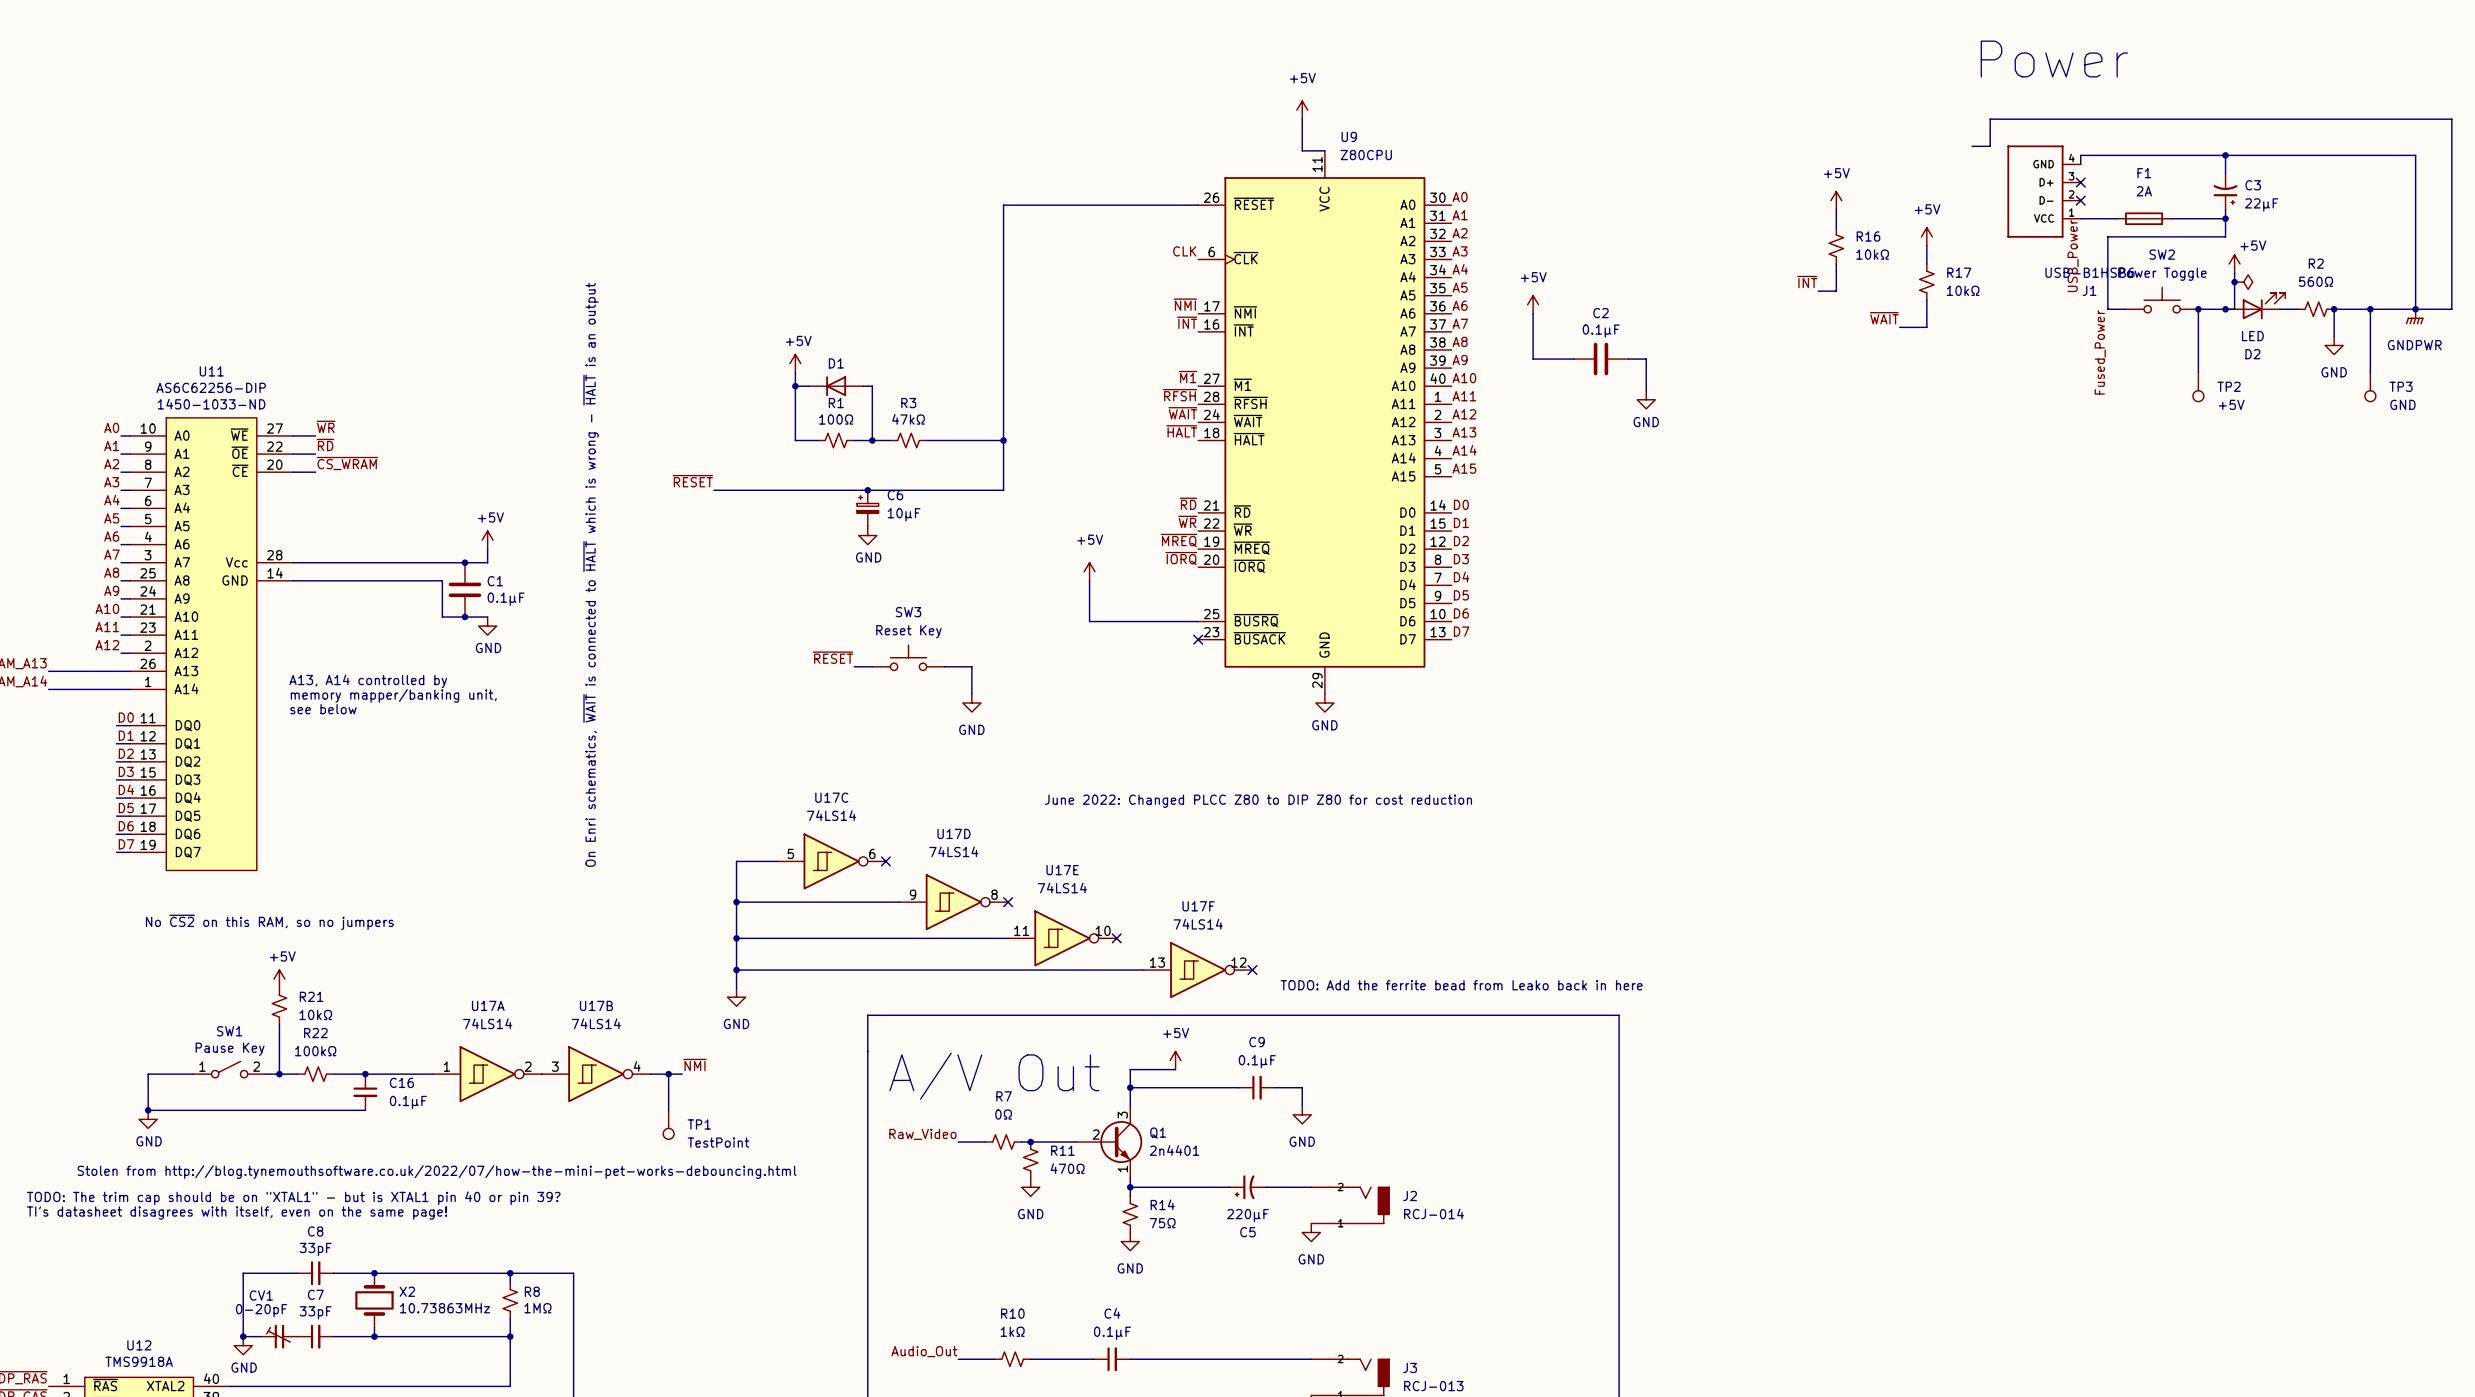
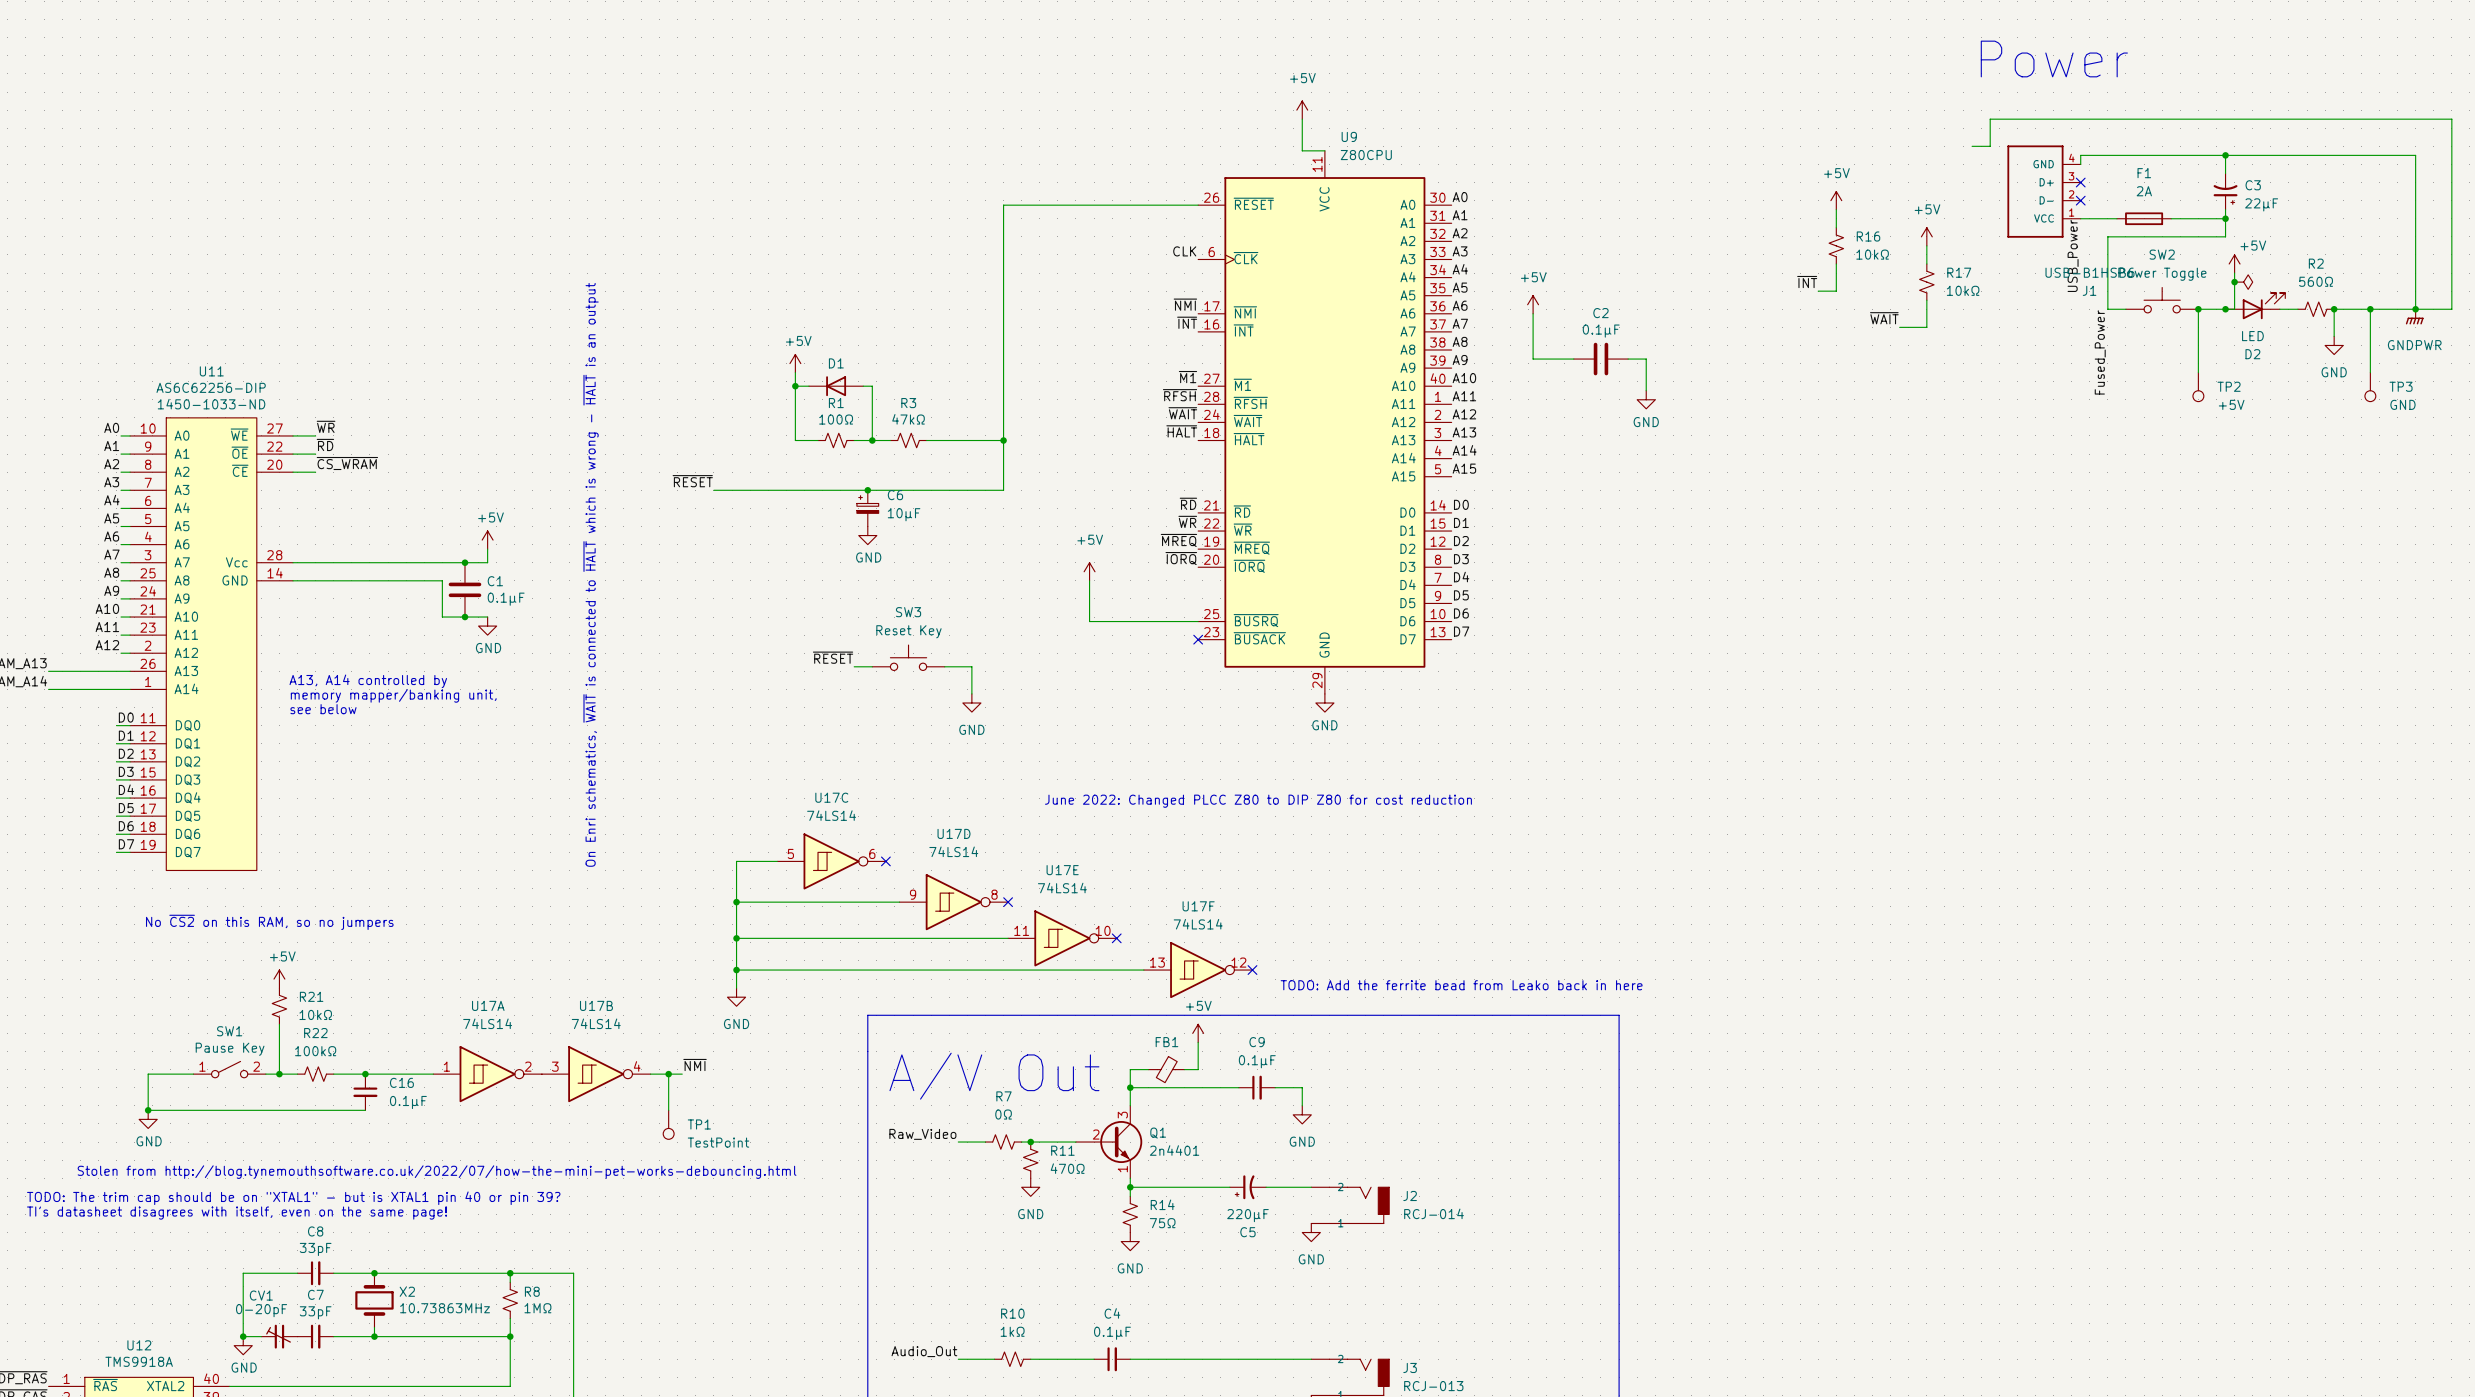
wire: none -> (1198, 1042) (1198, 1069) (1184, 1069)
power symbol position: +5V (1175, 1060) -> +5V (1198, 1033)
FB1: none -> (1166, 1069)

